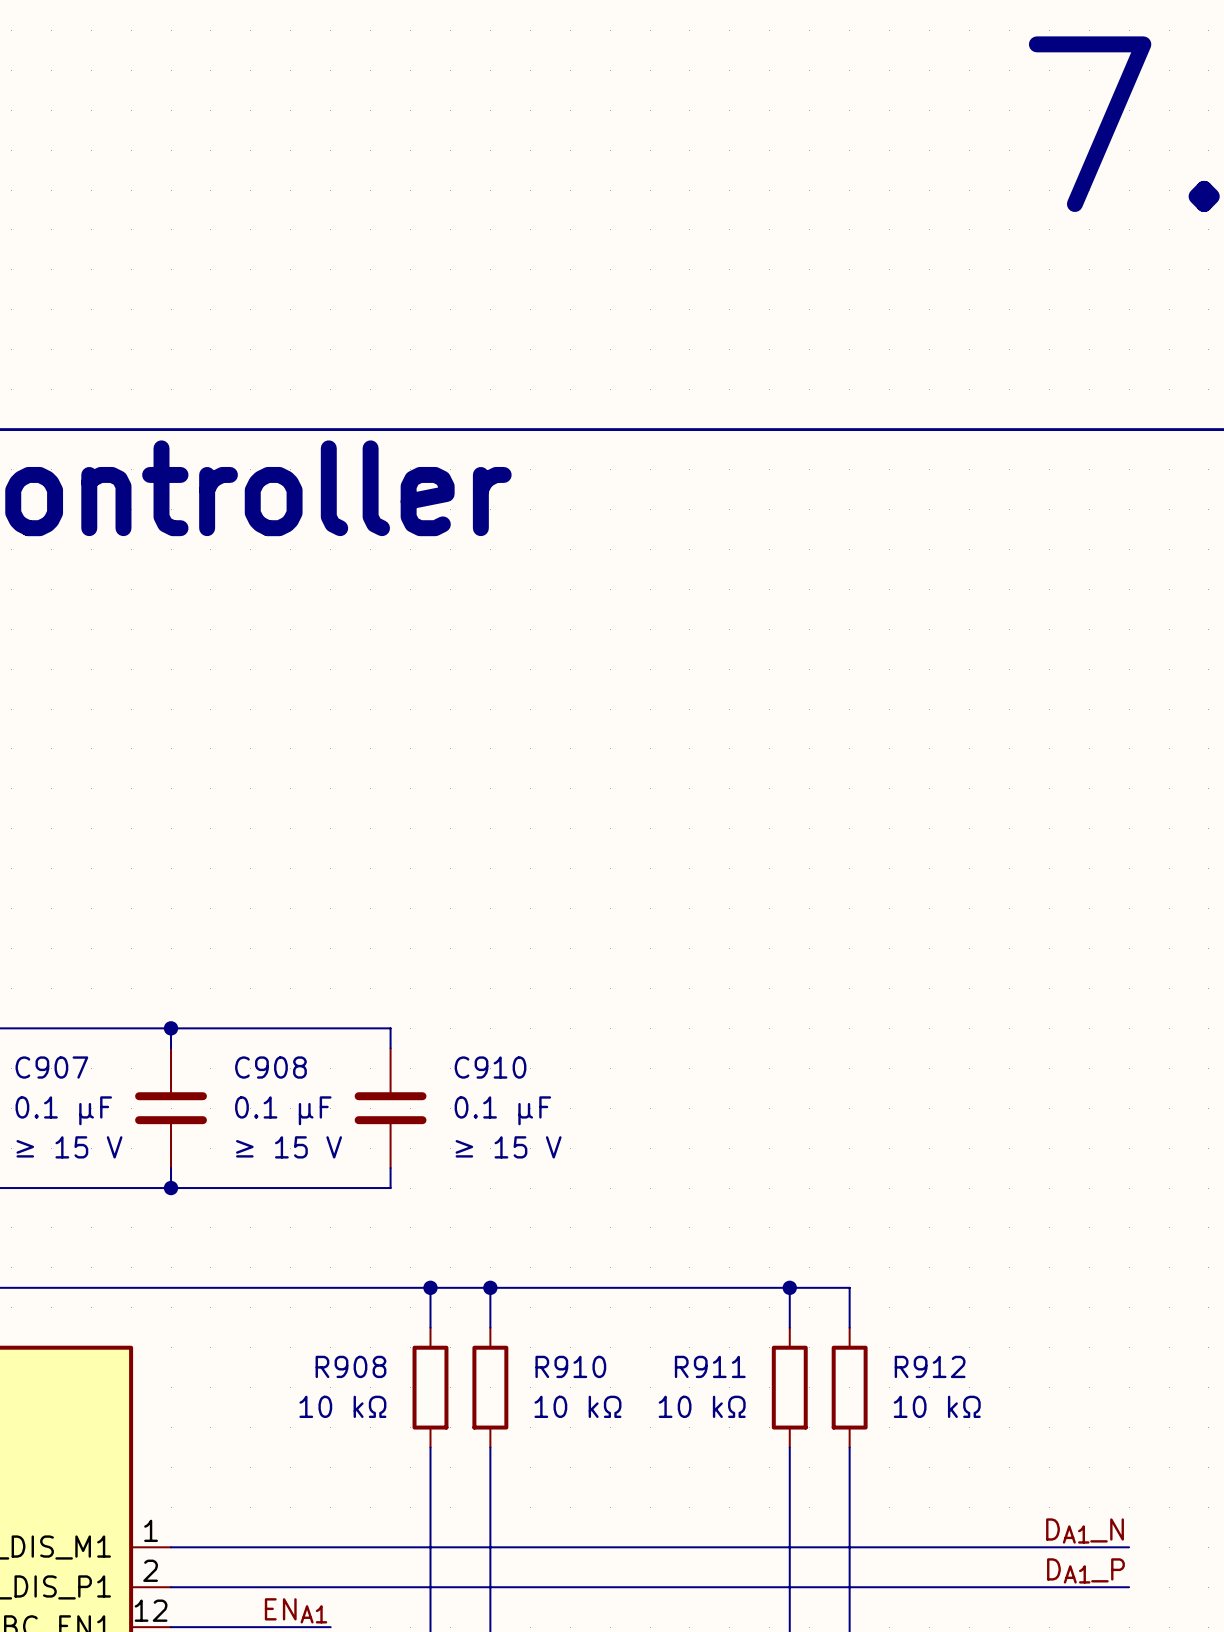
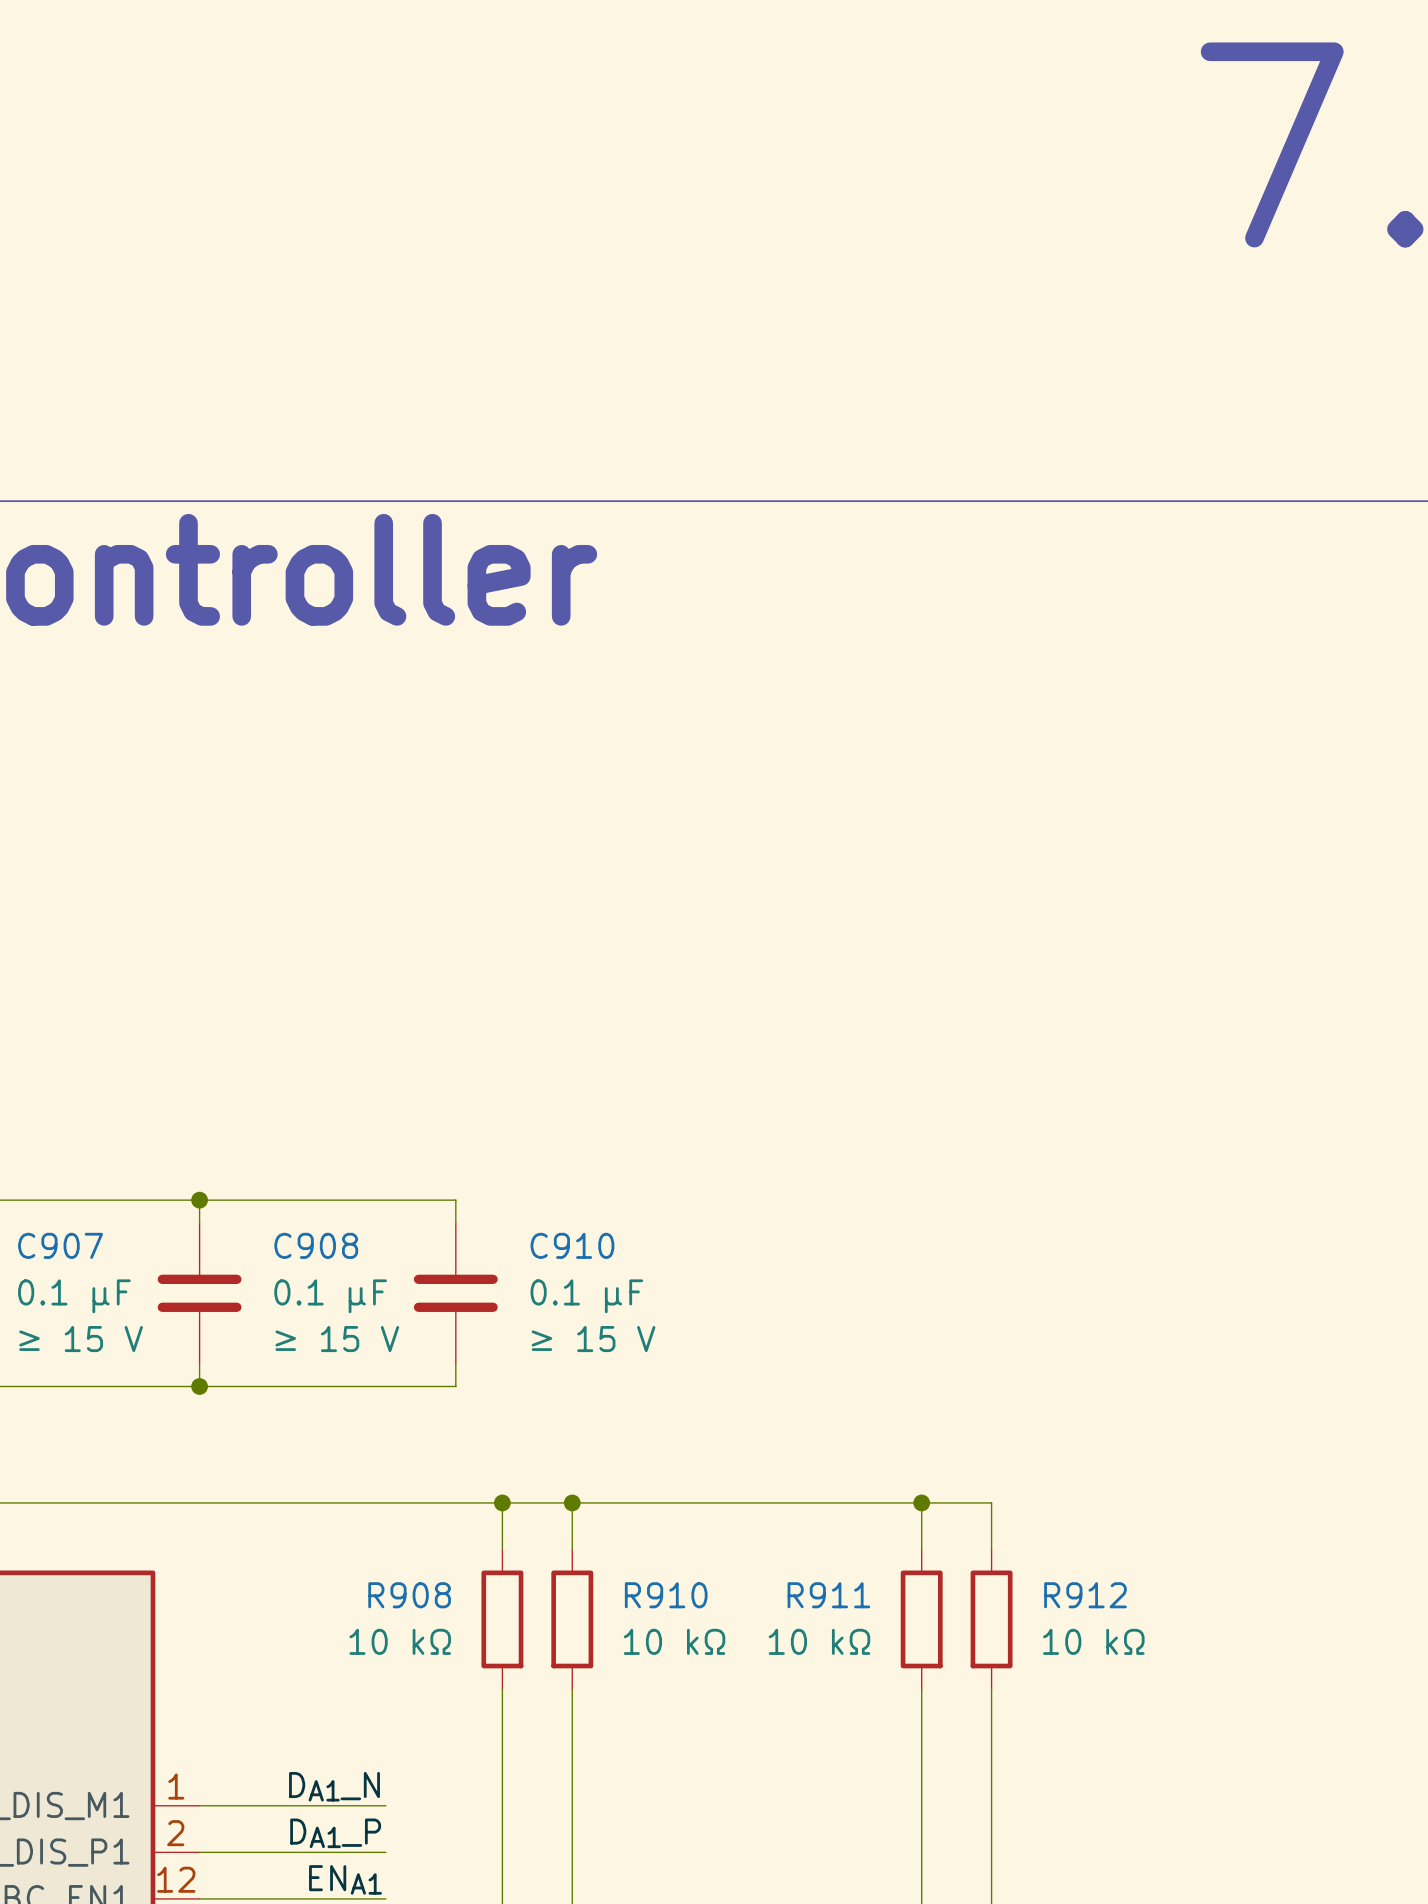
label: none -> DA1_N (334, 1786)
label: DA1_N (1085, 1530) -> none
wire: (330, 1547) (1129, 1547) -> none
label: none -> DA1_P (335, 1833)
label: DA1_P (1085, 1570) -> none
wire: (330, 1587) (1129, 1587) -> none

